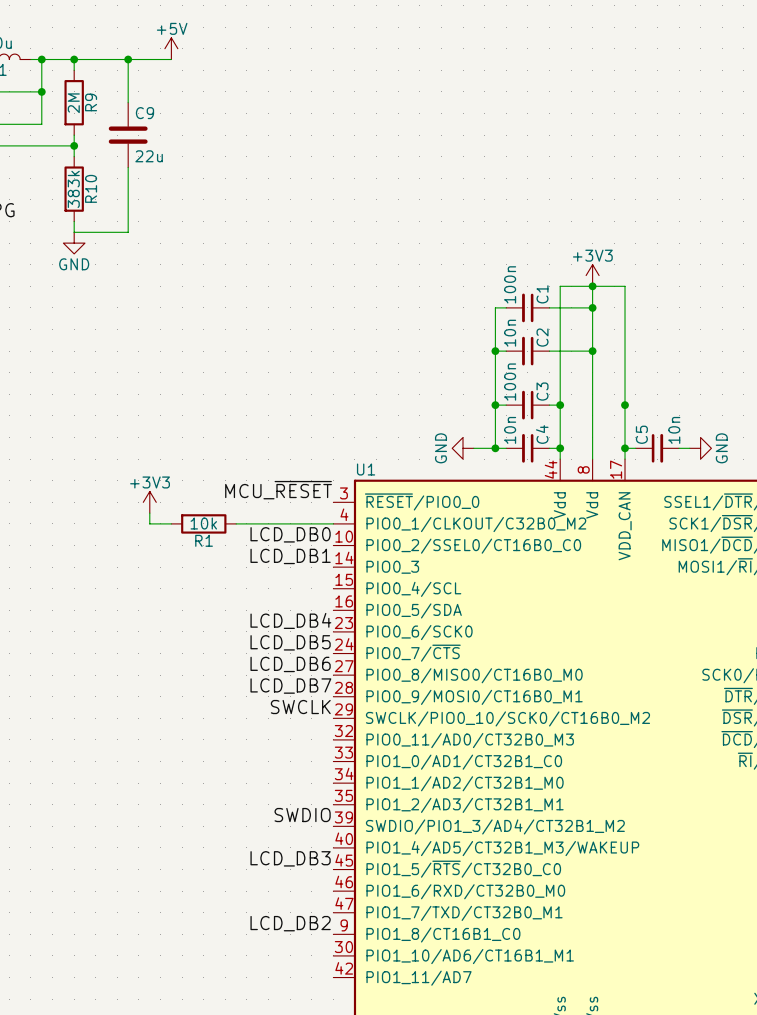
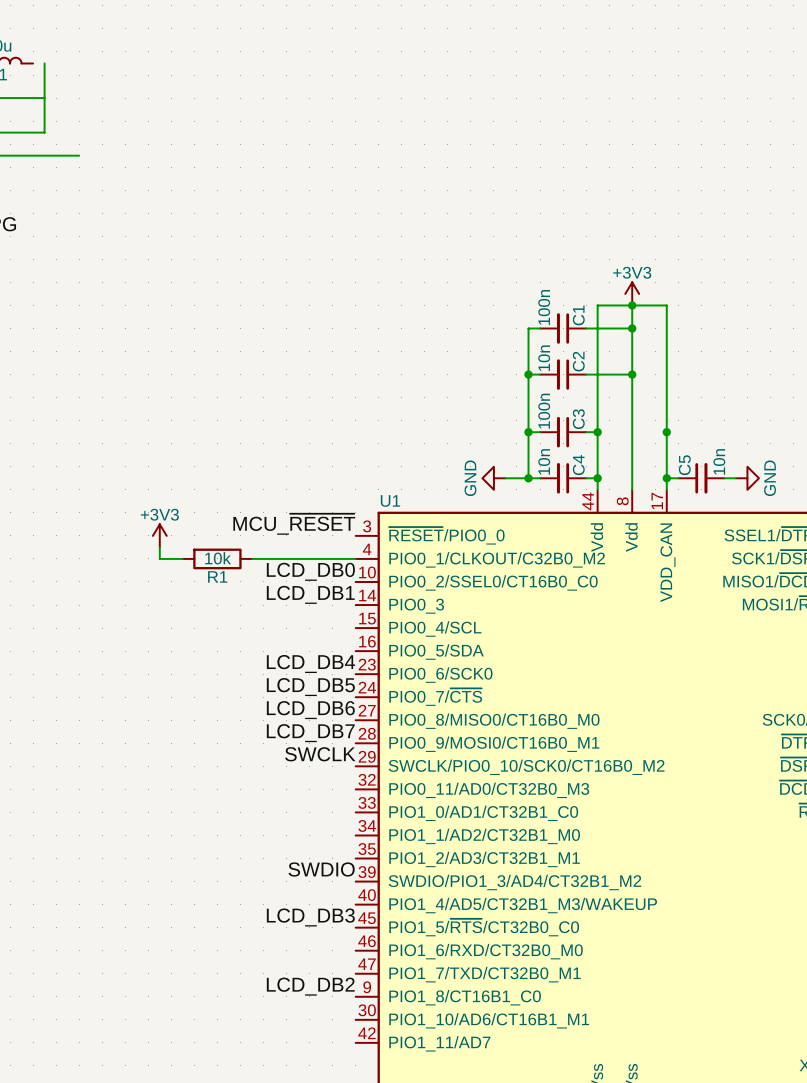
power symbol: +5V (171, 48) -> none
wire: (30, 59) (171, 59) -> none
junction: (41, 59) -> none
wire: (74, 59) (74, 70) -> none
junction: (74, 59) -> none
wire: (128, 59) (128, 102) -> none
junction: (128, 59) -> none
junction: (41, 91) -> none
R9: 2M (74, 102) -> none
wire: (74, 135) (74, 156) -> none
C9: 22u (128, 135) -> none
junction: (74, 145) -> none
wire: (128, 167) (128, 232) (74, 232) (74, 221) -> none
R10: 383k (74, 189) -> none
power symbol: GND (74, 243) -> none

